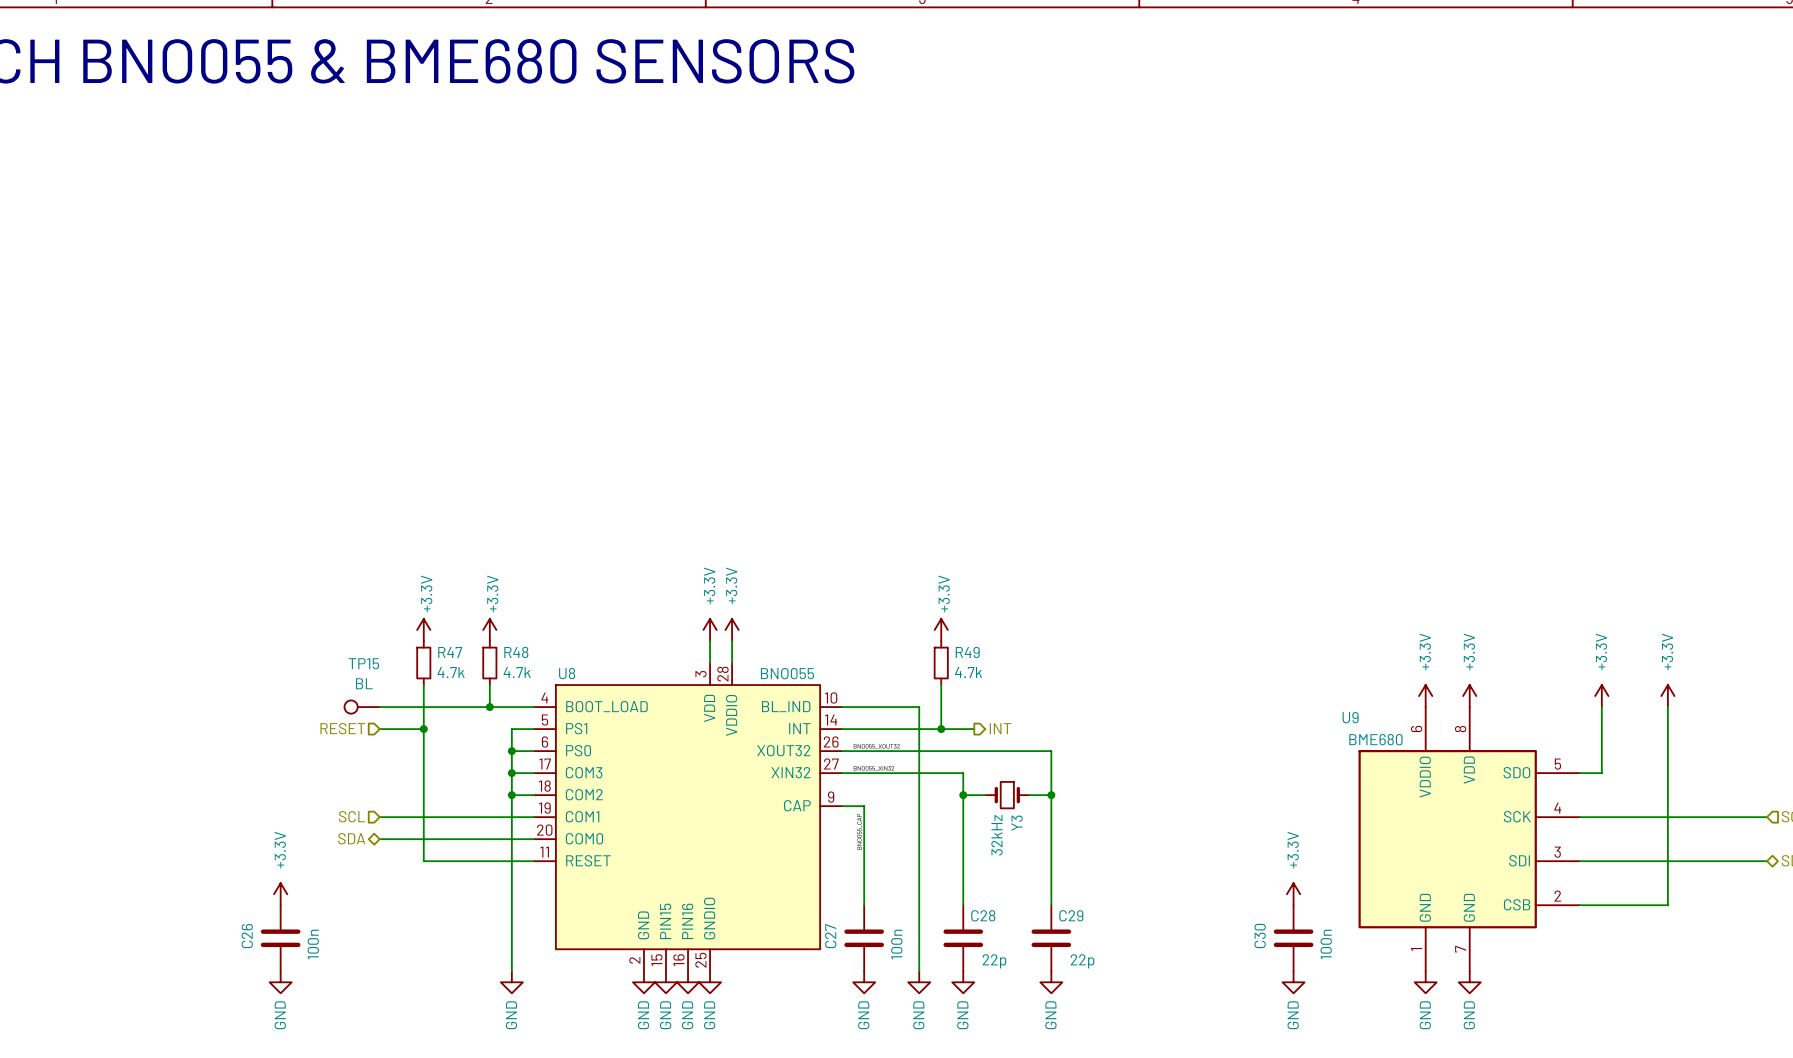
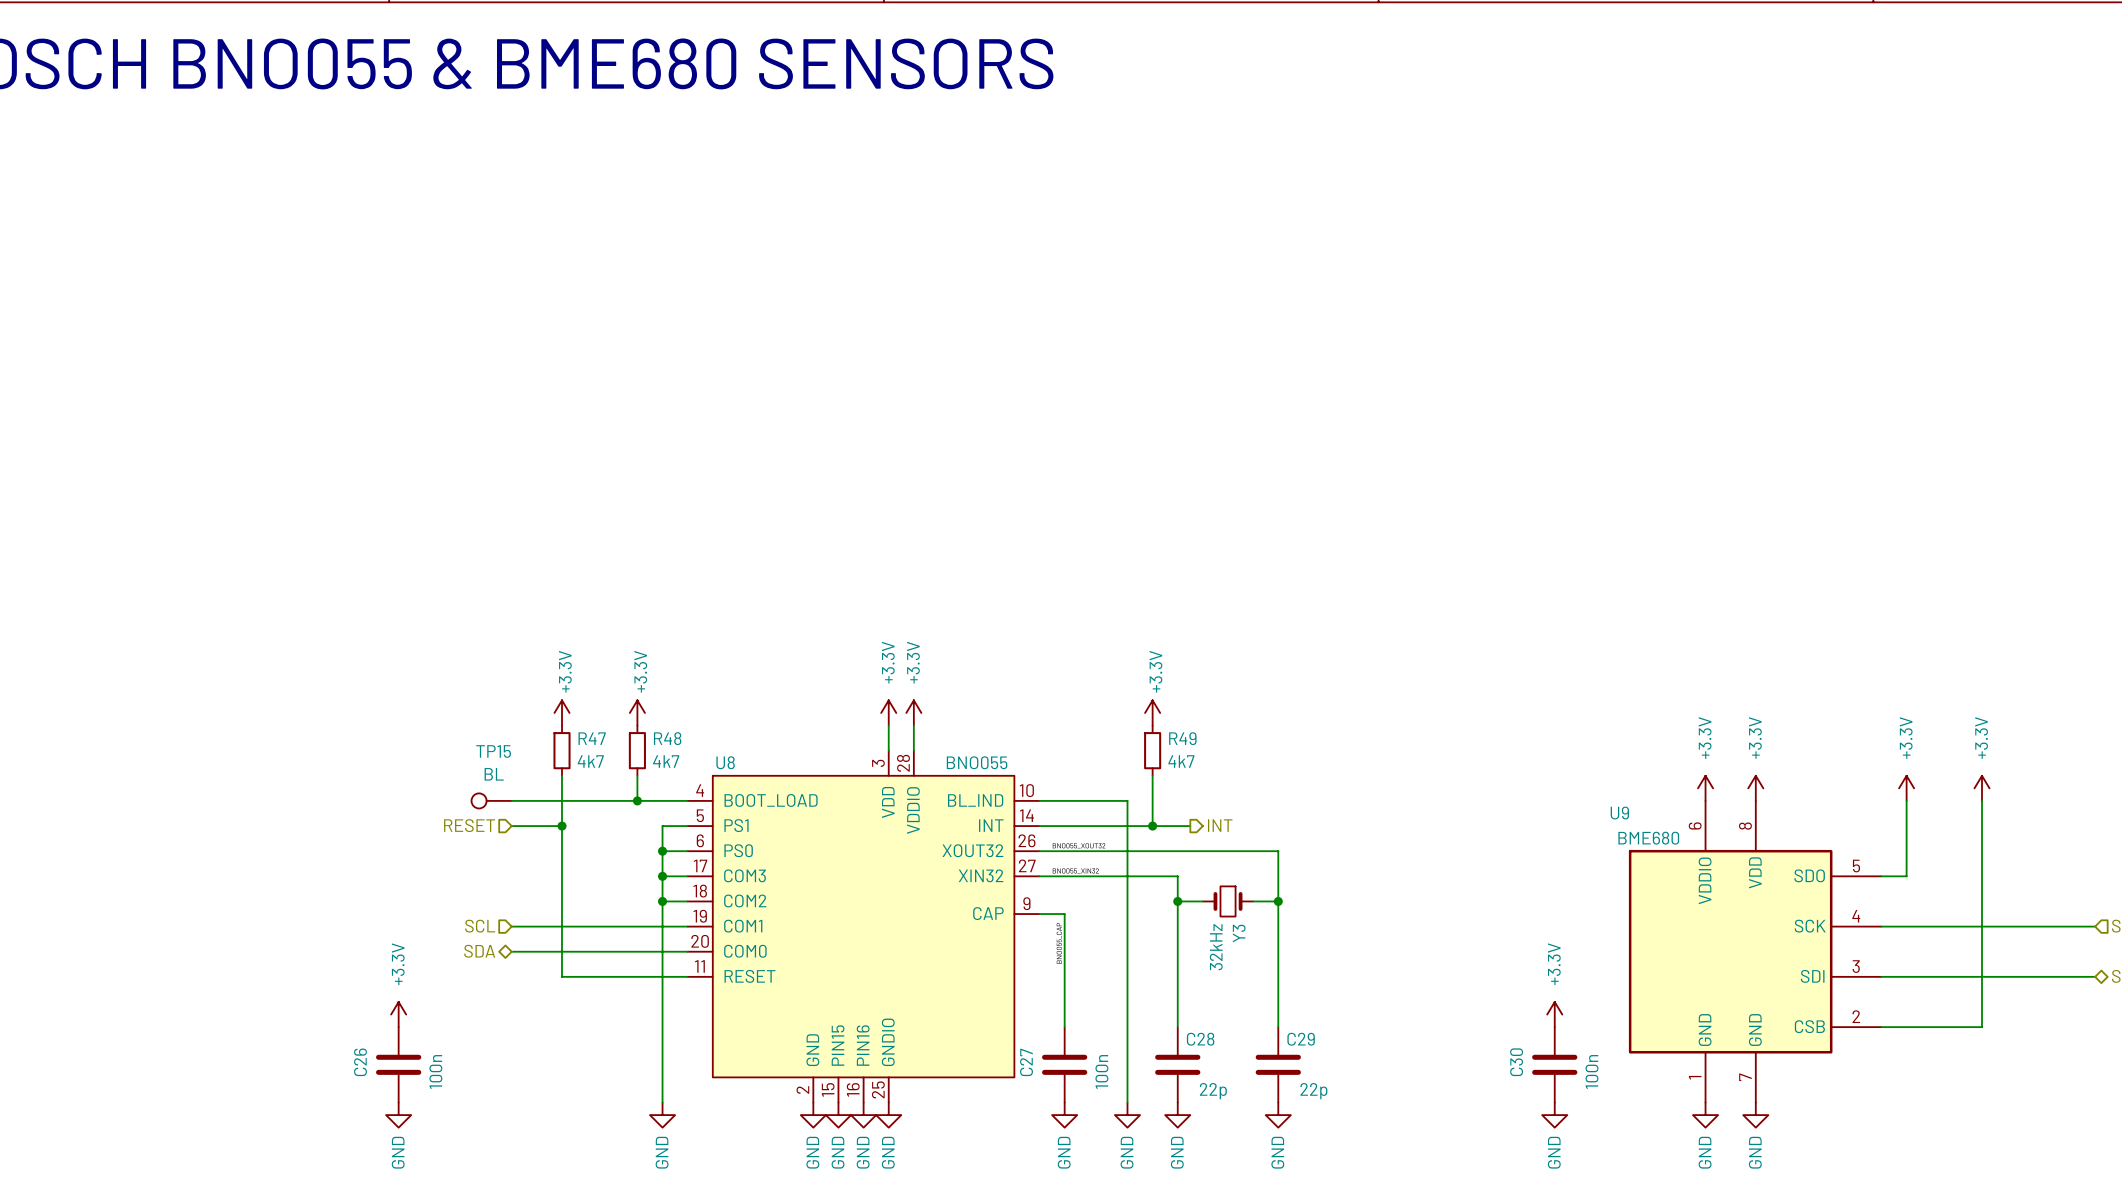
R47 value: 4.7k (451, 672) -> 4k7 (590, 761)
R48 value: 4.7k (517, 672) -> 4k7 (666, 761)
R49 value: 4.7k (968, 672) -> 4k7 (1181, 761)

